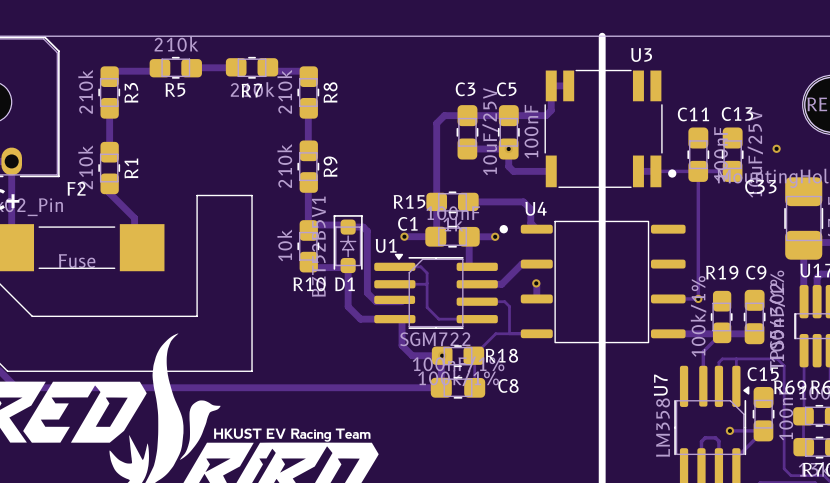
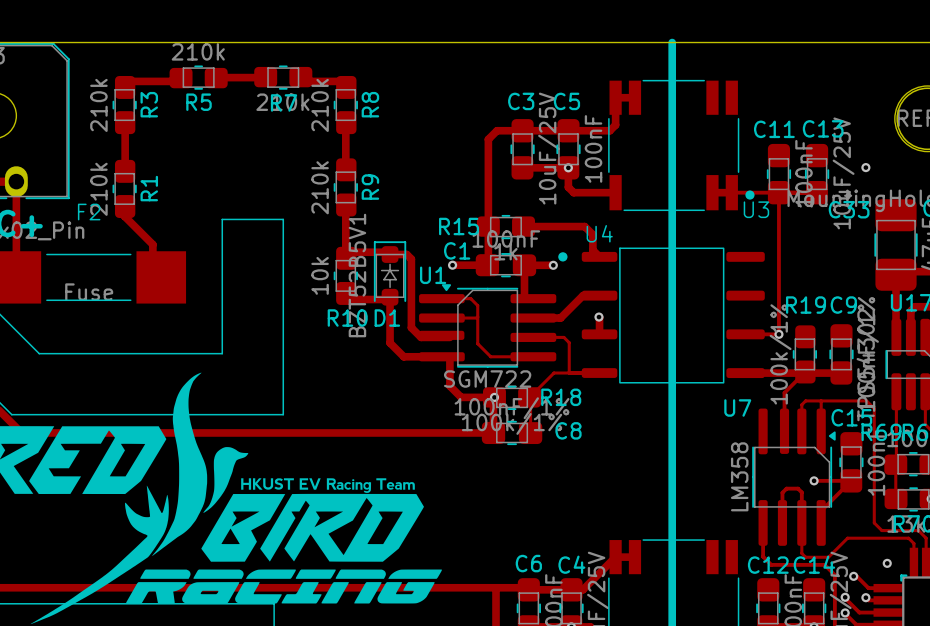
U3 name position: U3 (641, 54) -> U3 (756, 209)
U7 name rotation: 0° (660, 385) -> 90° clockwise (737, 407)

